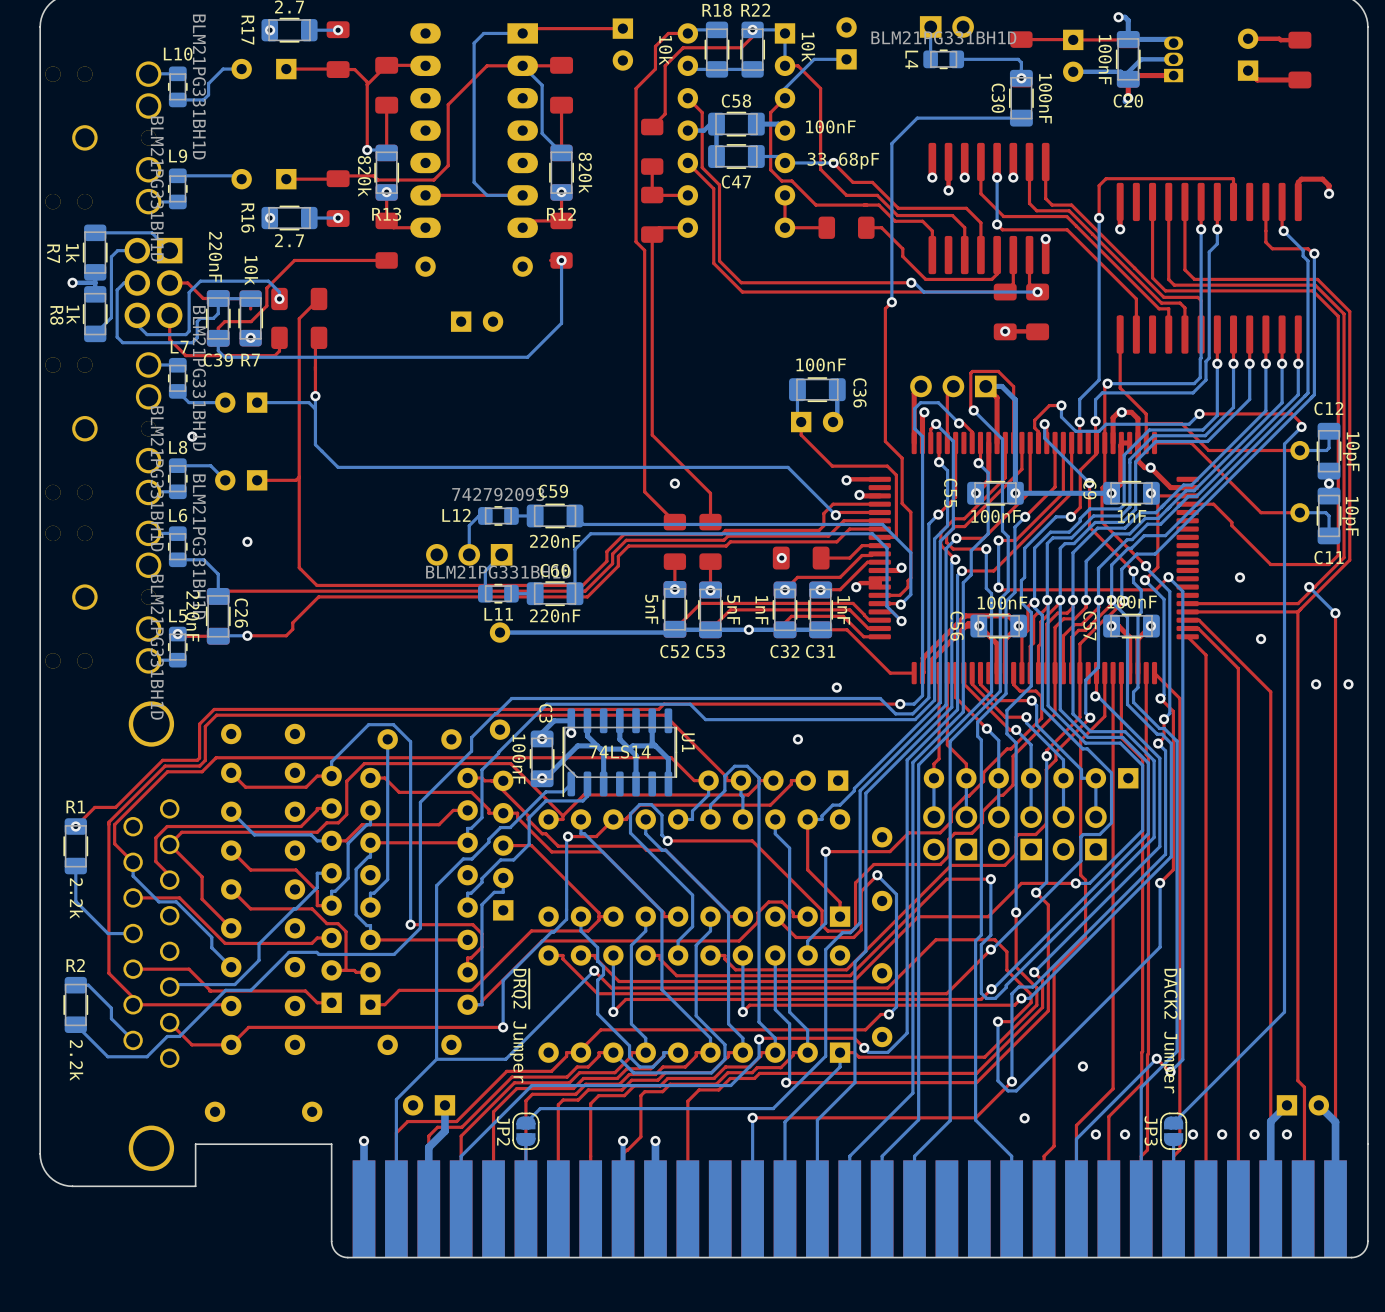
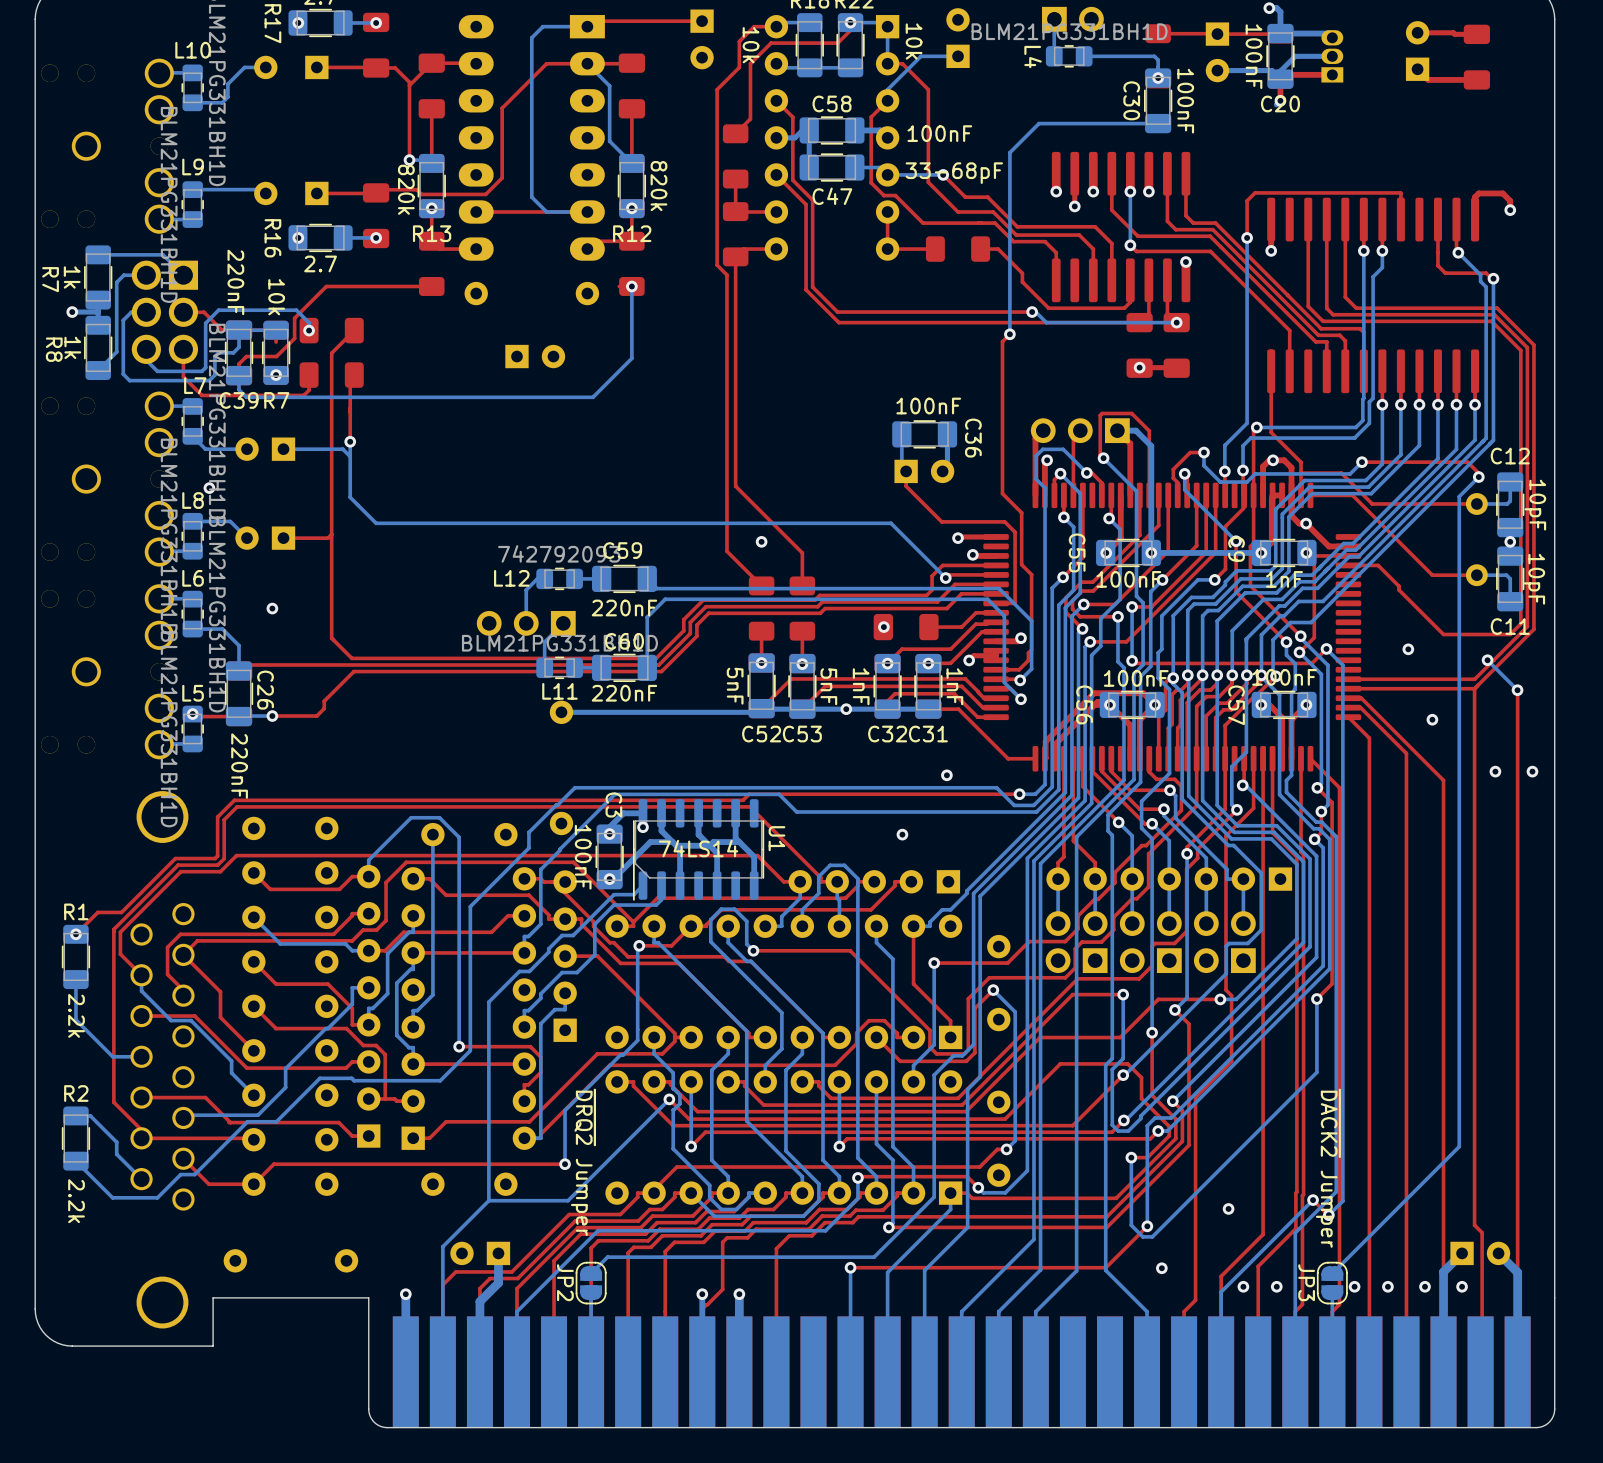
C26 value position: 220nF (192, 616) -> 220nF (239, 766)

